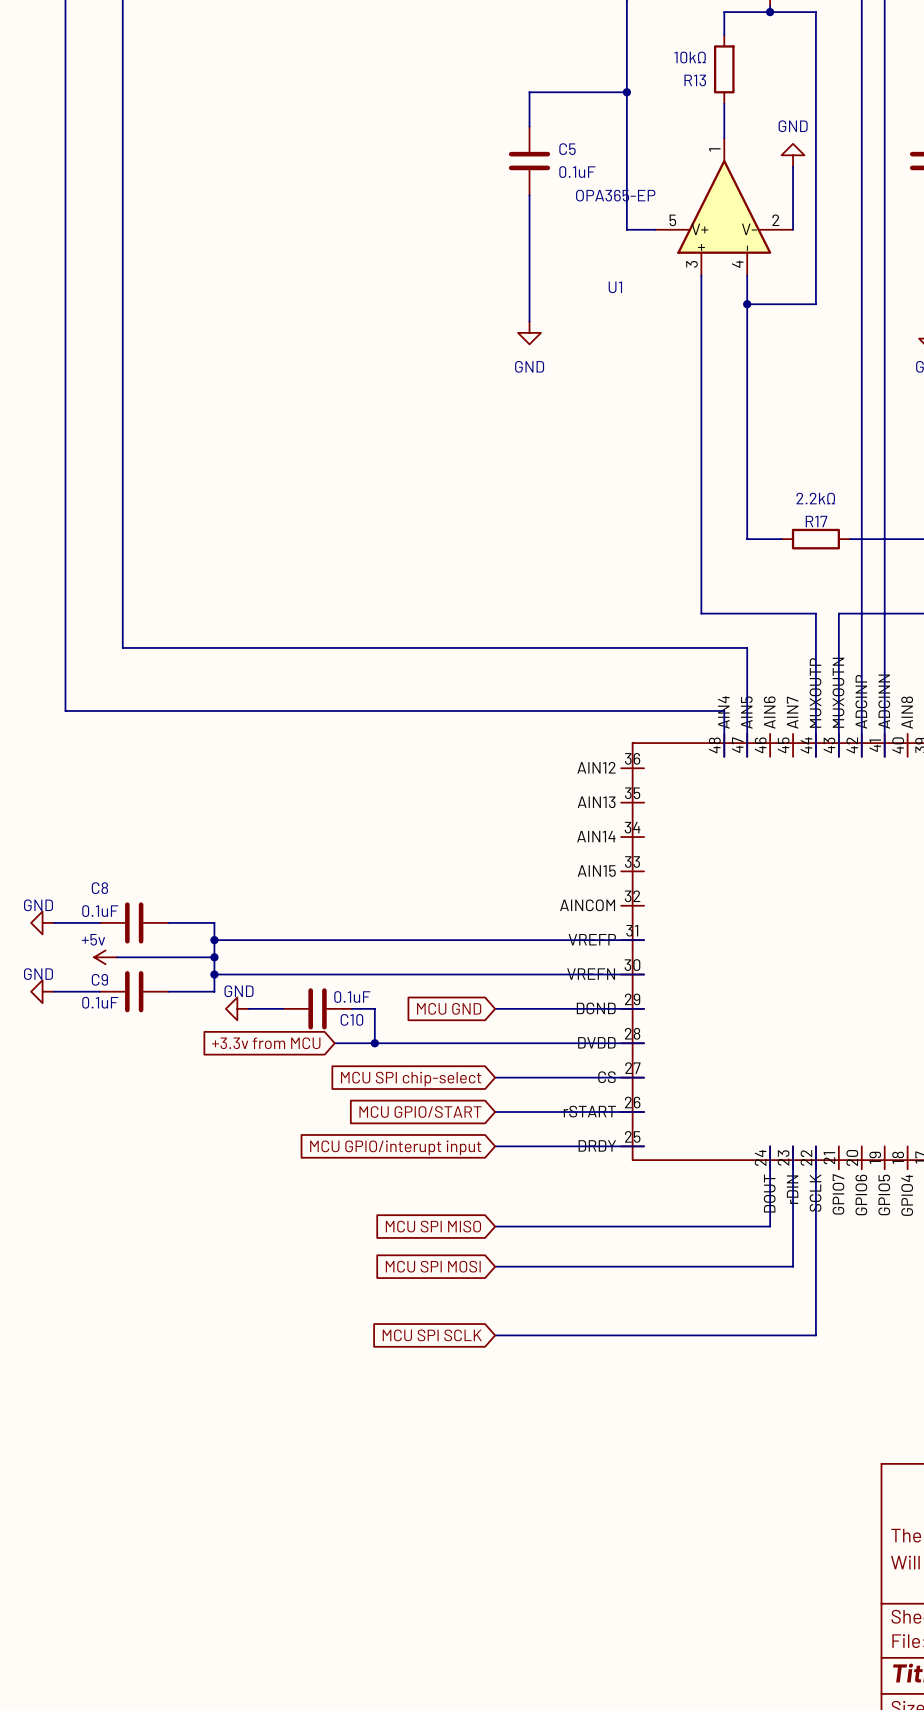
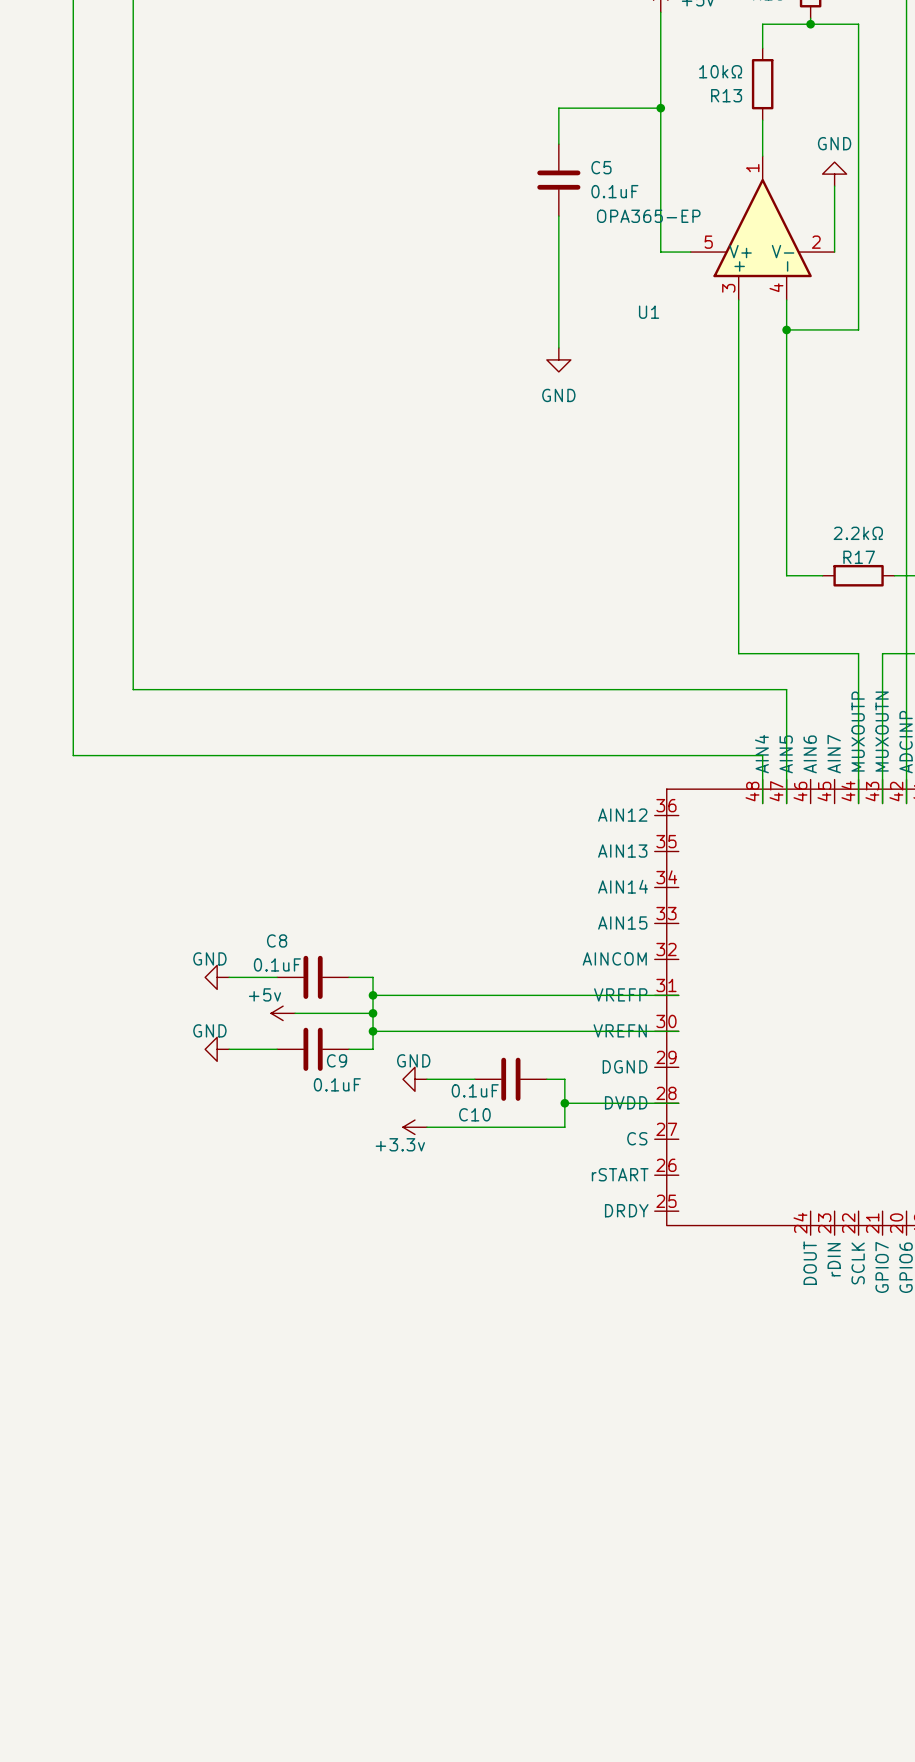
power symbol: GND (42, 922) -> none
wire: (54, 922) (99, 922) -> (229, 977) (277, 977)
C8 position: (134, 922) -> (313, 977)
wire: (168, 922) (214, 922) (214, 991) (168, 991) -> none
power symbol: none -> GND (217, 977)
wire: none -> (349, 977) (373, 977) (373, 1049) (349, 1049)
wire: (214, 940) (351, 940) -> none
junction: (214, 940) -> none
junction: none -> (373, 995)
power symbol position: +5v (105, 957) -> +5v (283, 1013)
wire: (117, 957) (214, 957) -> none
junction: (214, 957) -> none
wire: none -> (295, 1013) (373, 1013)
junction: none -> (373, 1013)
wire: (214, 974) (351, 974) -> none
junction: (214, 974) -> none
junction: none -> (373, 1031)
C9 name position: C9 (99, 979) -> C9 (337, 1060)
power symbol: GND (42, 991) -> none
wire: (54, 991) (99, 991) -> (229, 1049) (277, 1049)
C9 position: (134, 991) -> (313, 1049)
power symbol text position: GND (239, 991) -> GND (209, 1030)
C10 value position: 0.1uF (352, 997) -> 0.1uF (475, 1090)
C9 value position: 0.1uF (100, 1002) -> 0.1uF (337, 1084)
power symbol position: GND (237, 1008) -> GND (217, 1049)
wire: (248, 1008) (283, 1008) -> none
C10 position: (317, 1008) -> (510, 1079)
wire: (351, 1008) (374, 1008) (374, 1043) -> none
global label: MCU GND (449, 1008) -> none
wire: (495, 1008) (644, 1008) -> none
C10 name position: C10 (351, 1019) -> C10 (474, 1114)
power symbol: none -> GND (414, 1079)
wire: none -> (546, 1079) (564, 1079) (564, 1127) (426, 1127)
global label: +3.3v from MCU (266, 1043) -> none
wire: (334, 1043) (535, 1043) -> none
junction: (374, 1043) -> none
junction: none -> (564, 1103)
power symbol: none -> +3.3v (414, 1127)
wire: (495, 1077) (644, 1077) -> none
global label: MCU SPI chip-select (411, 1079) -> none
global label: MCU GPIO/START (420, 1112) -> none
wire: (495, 1112) (644, 1112) -> none
wire: (495, 1146) (644, 1146) -> none
wire: (770, 1146) (770, 1226) (495, 1226) -> none
wire: (793, 1146) (793, 1266) (495, 1266) -> none
wire: (815, 1146) (815, 1335) (495, 1335) -> none
global label: MCU GPIO/interupt input (395, 1147) -> none
global label: MCU SPI MISO (433, 1226) -> none
global label: MCU SPI MOSI (433, 1266) -> none
global label: MCU SPI SCLK (432, 1335) -> none

